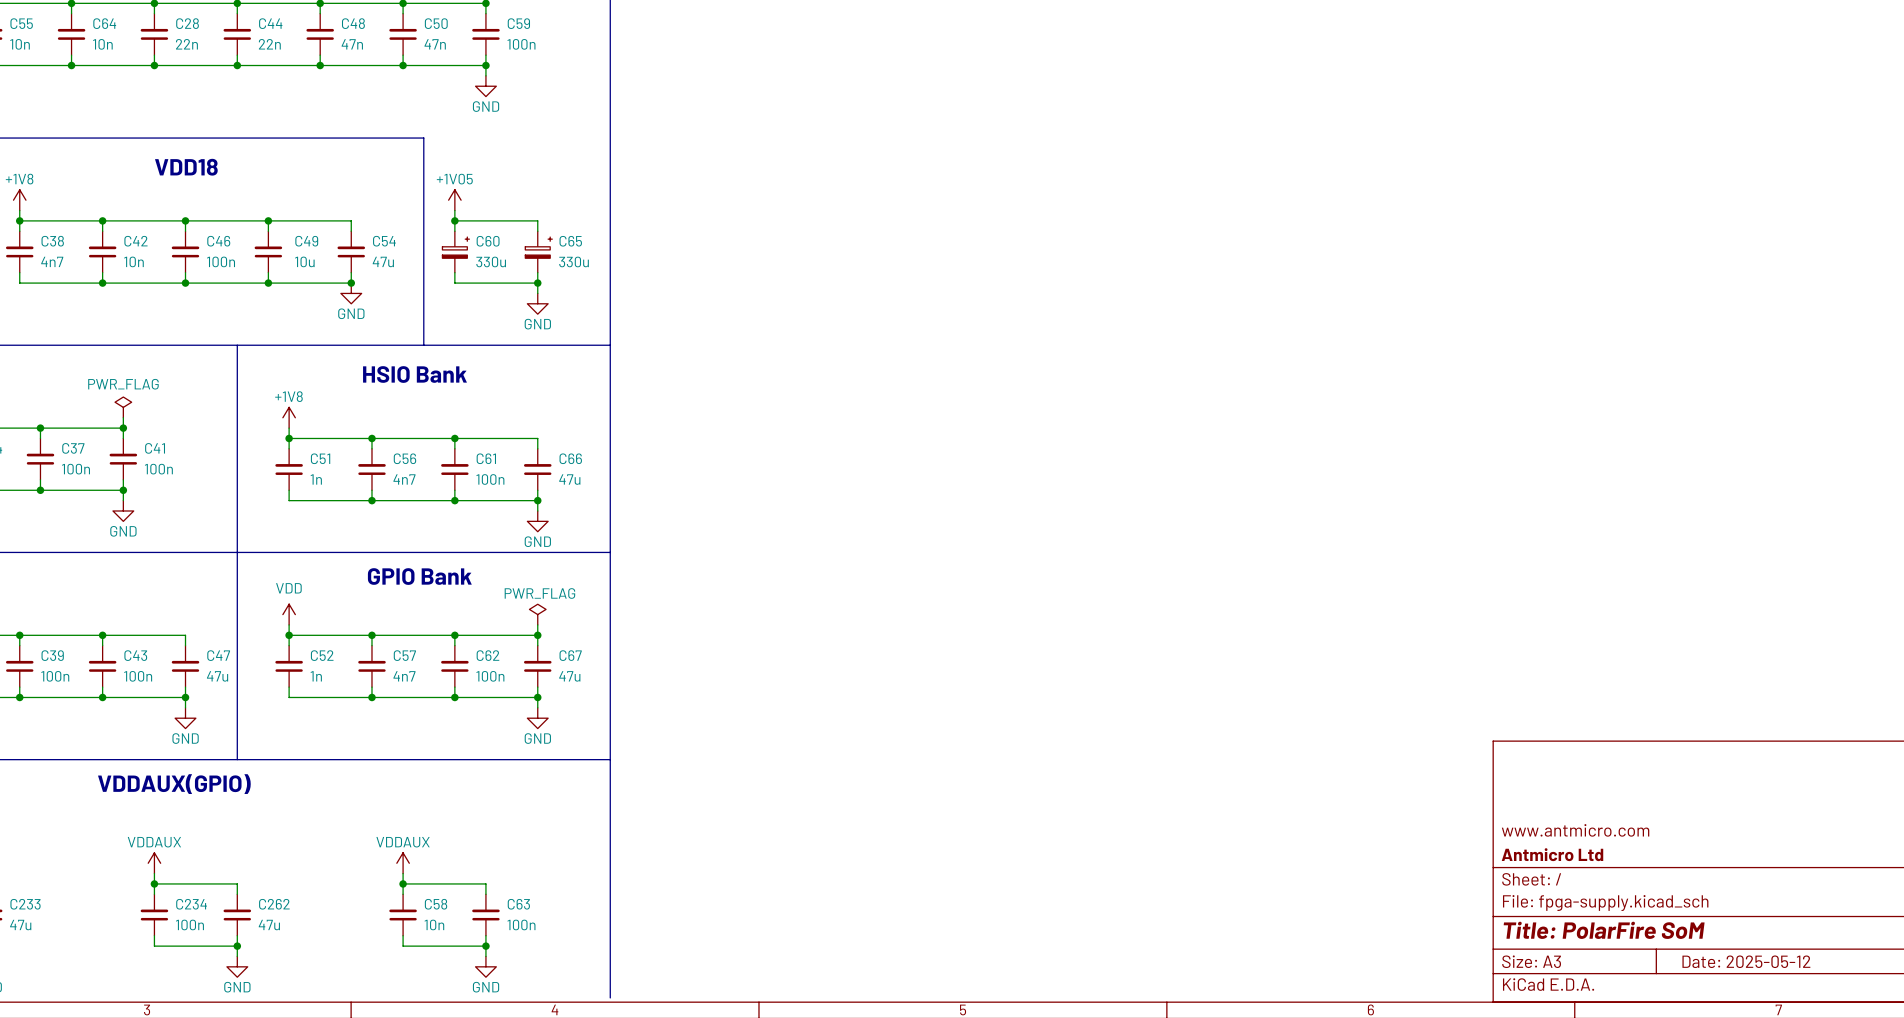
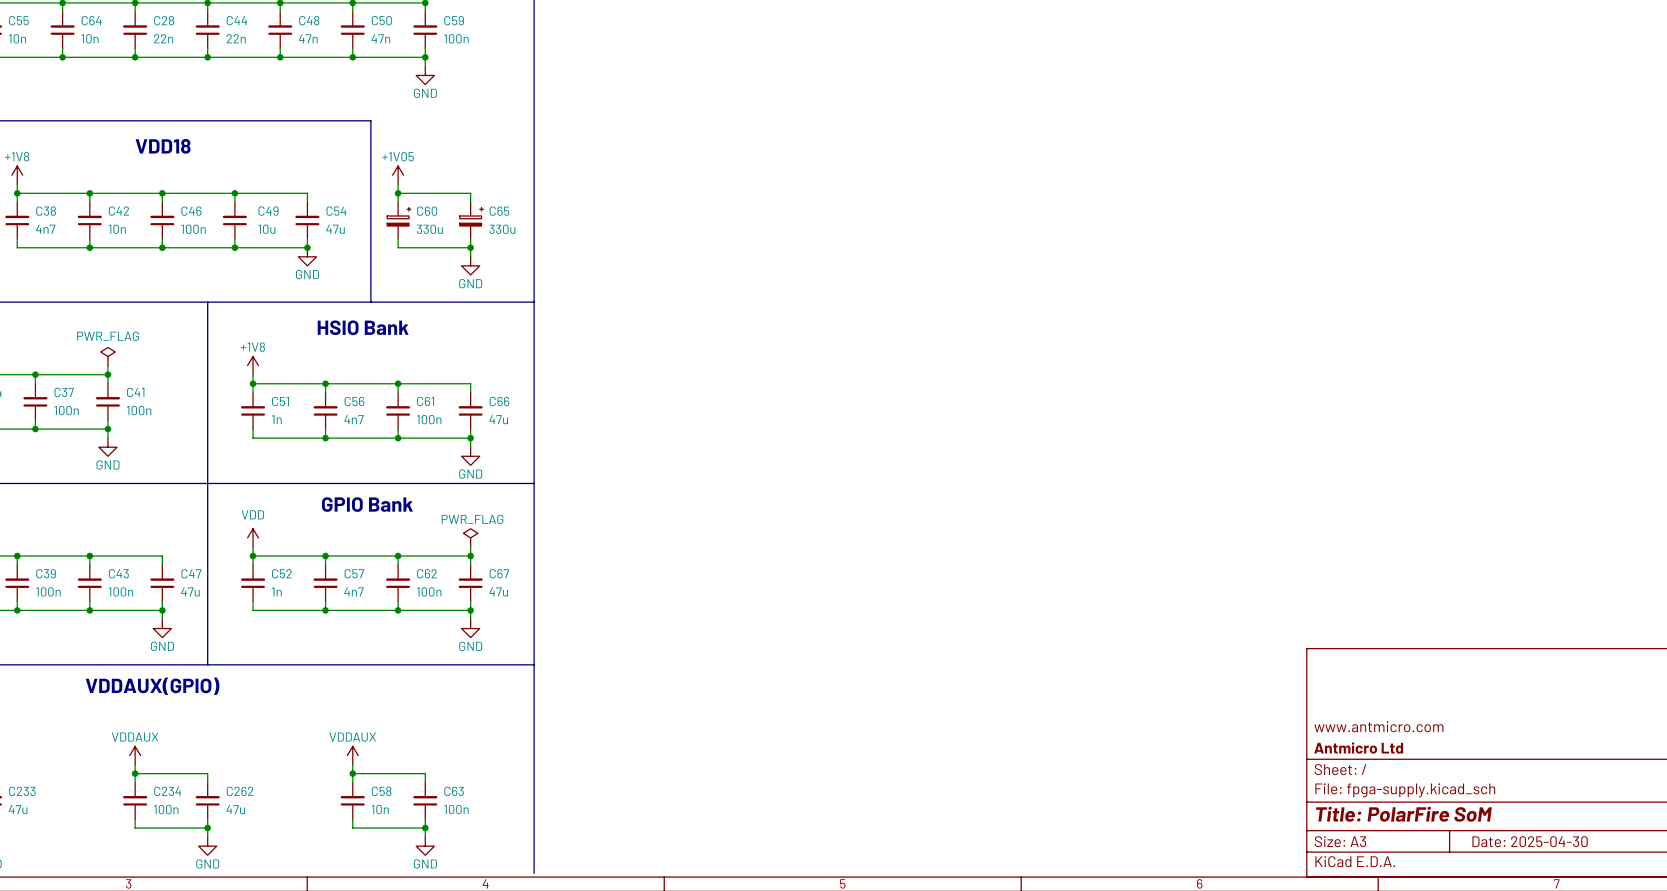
title block: Date: 2025-05-12 (1746, 961) -> Date: 2025-04-30 (1530, 841)

